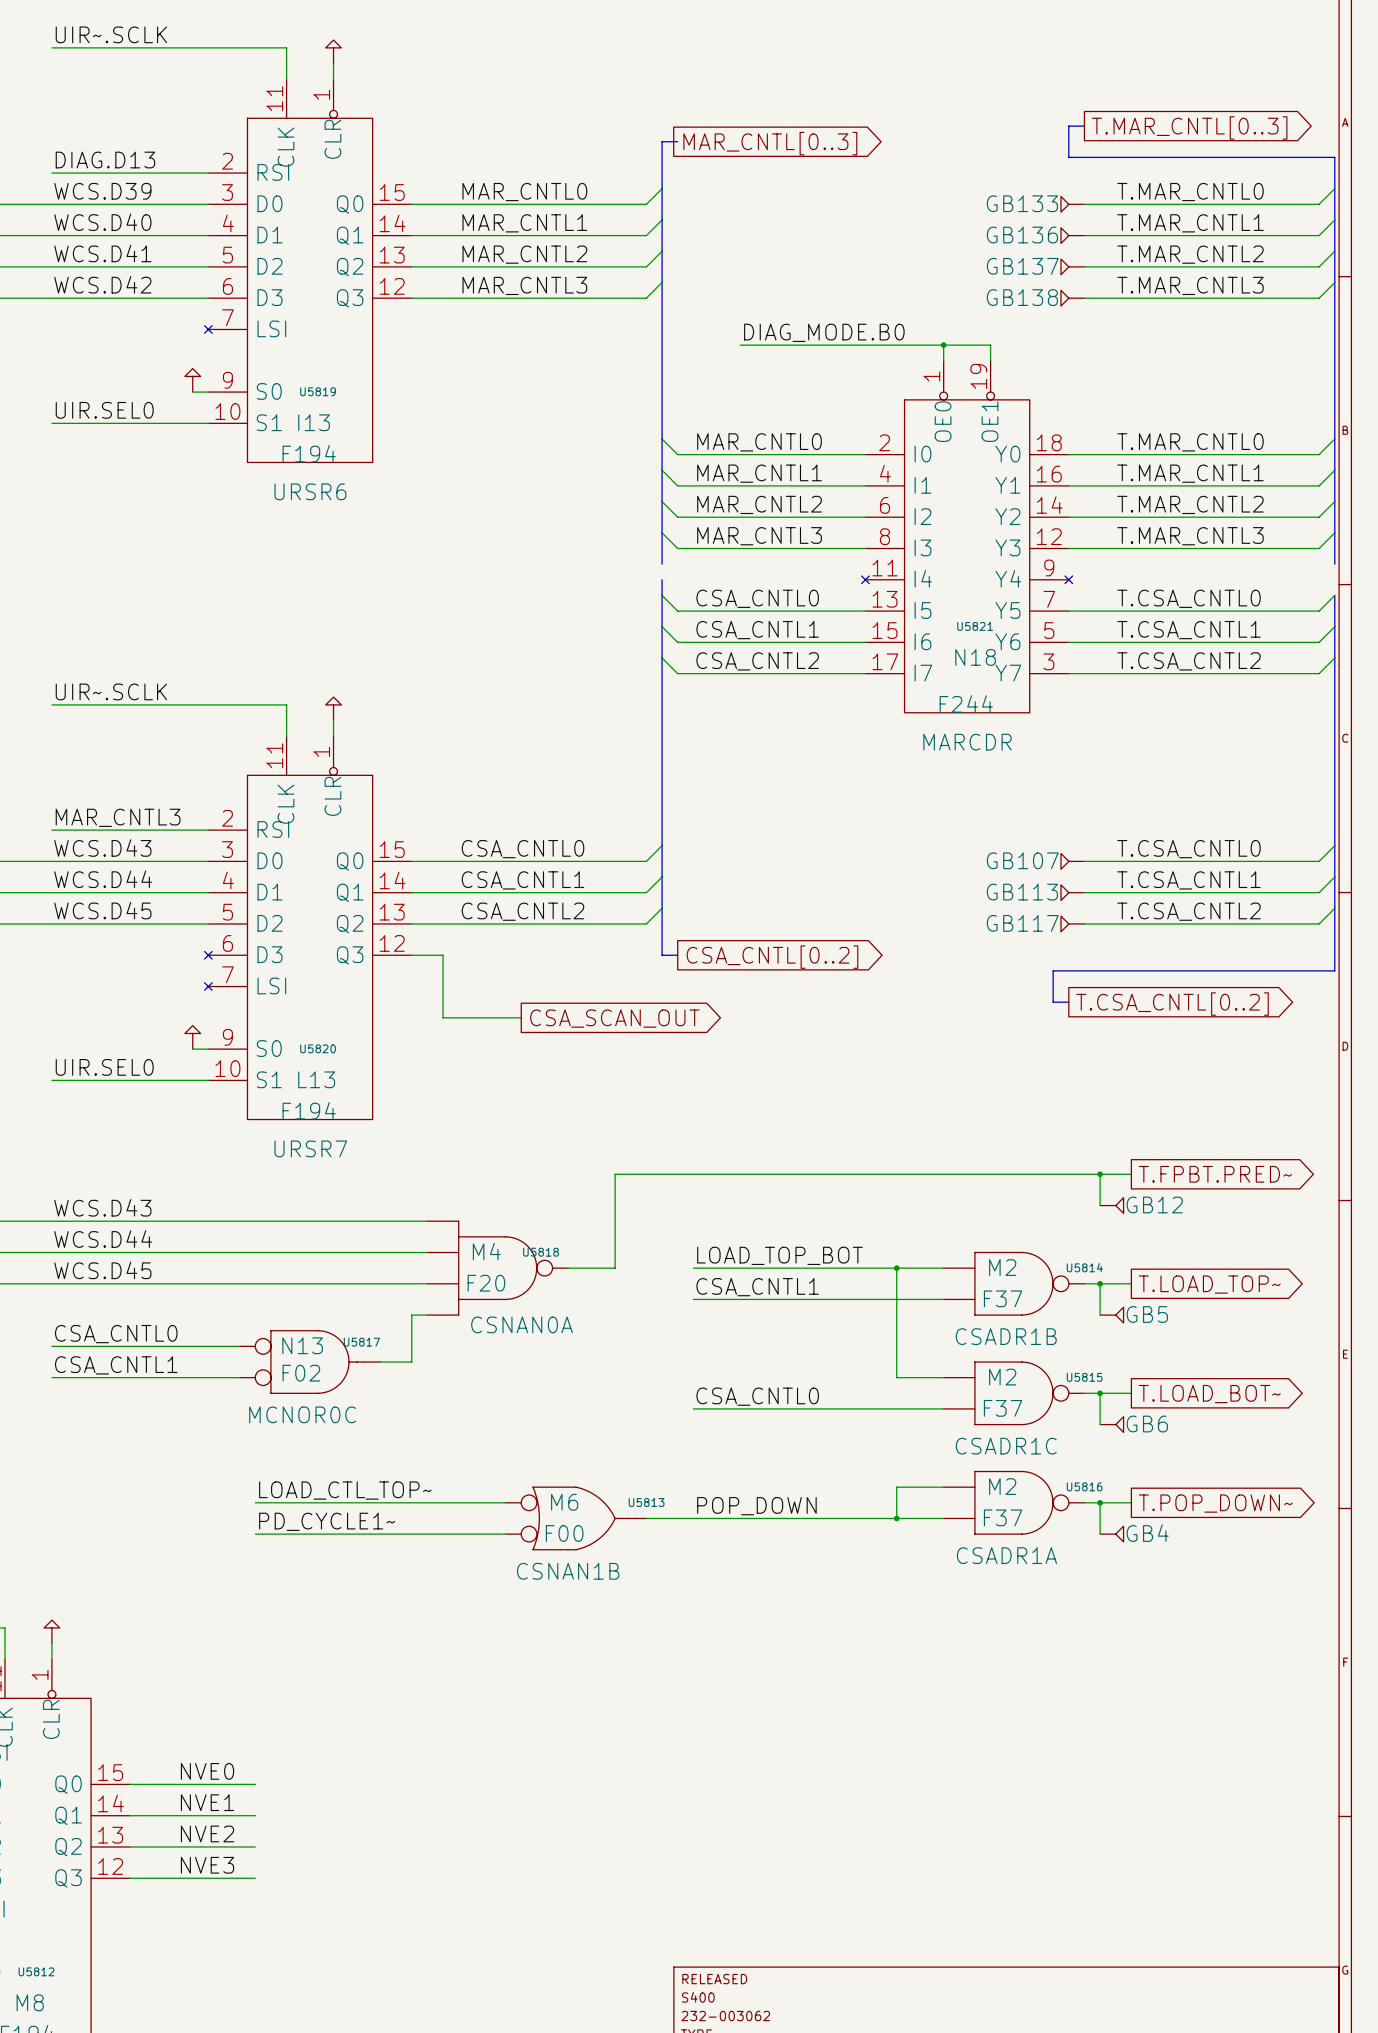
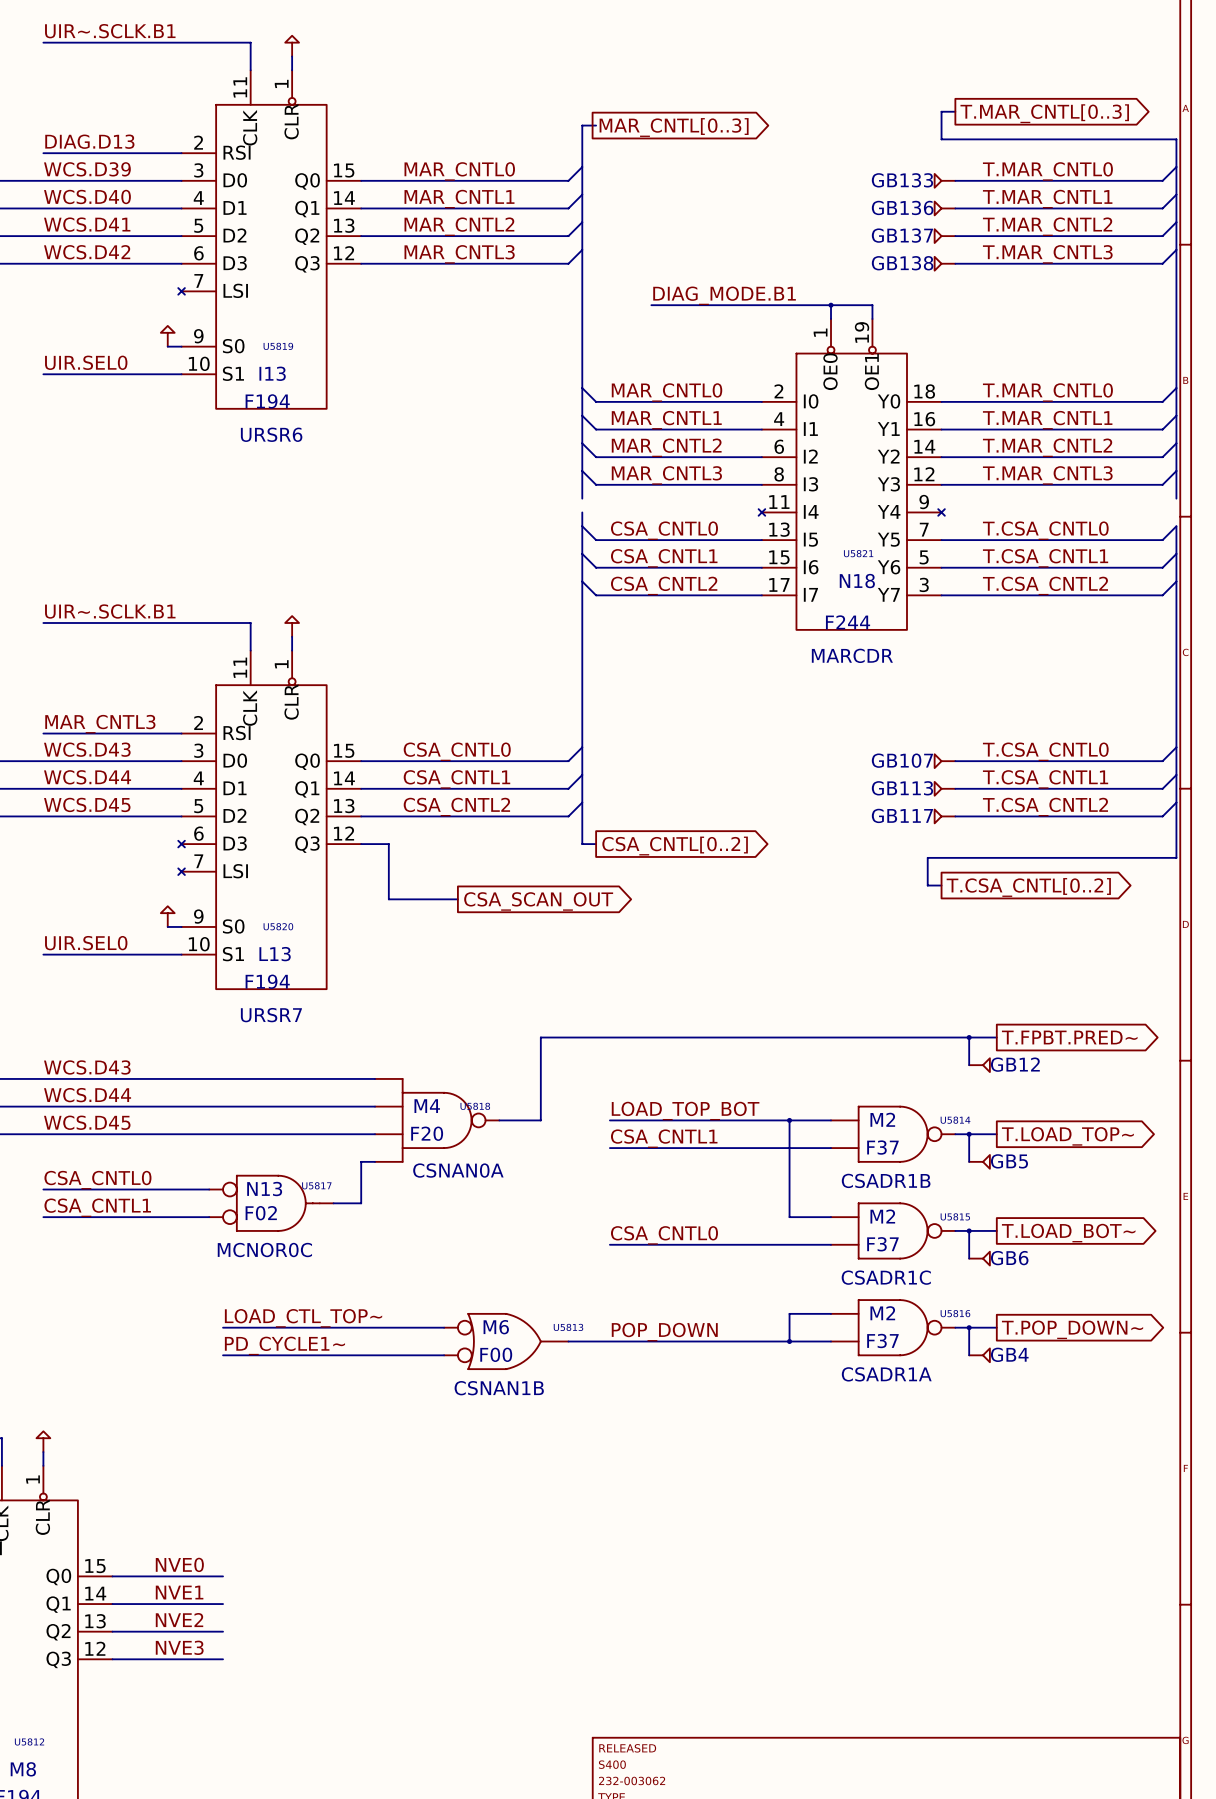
label: UIR~.SCLK (111, 34) -> UIR~.SCLK.B1 (110, 31)
label: DIAG_MODE.B0 (824, 332) -> DIAG_MODE.B1 (724, 295)
label: UIR~.SCLK (111, 691) -> UIR~.SCLK.B1 (110, 611)

